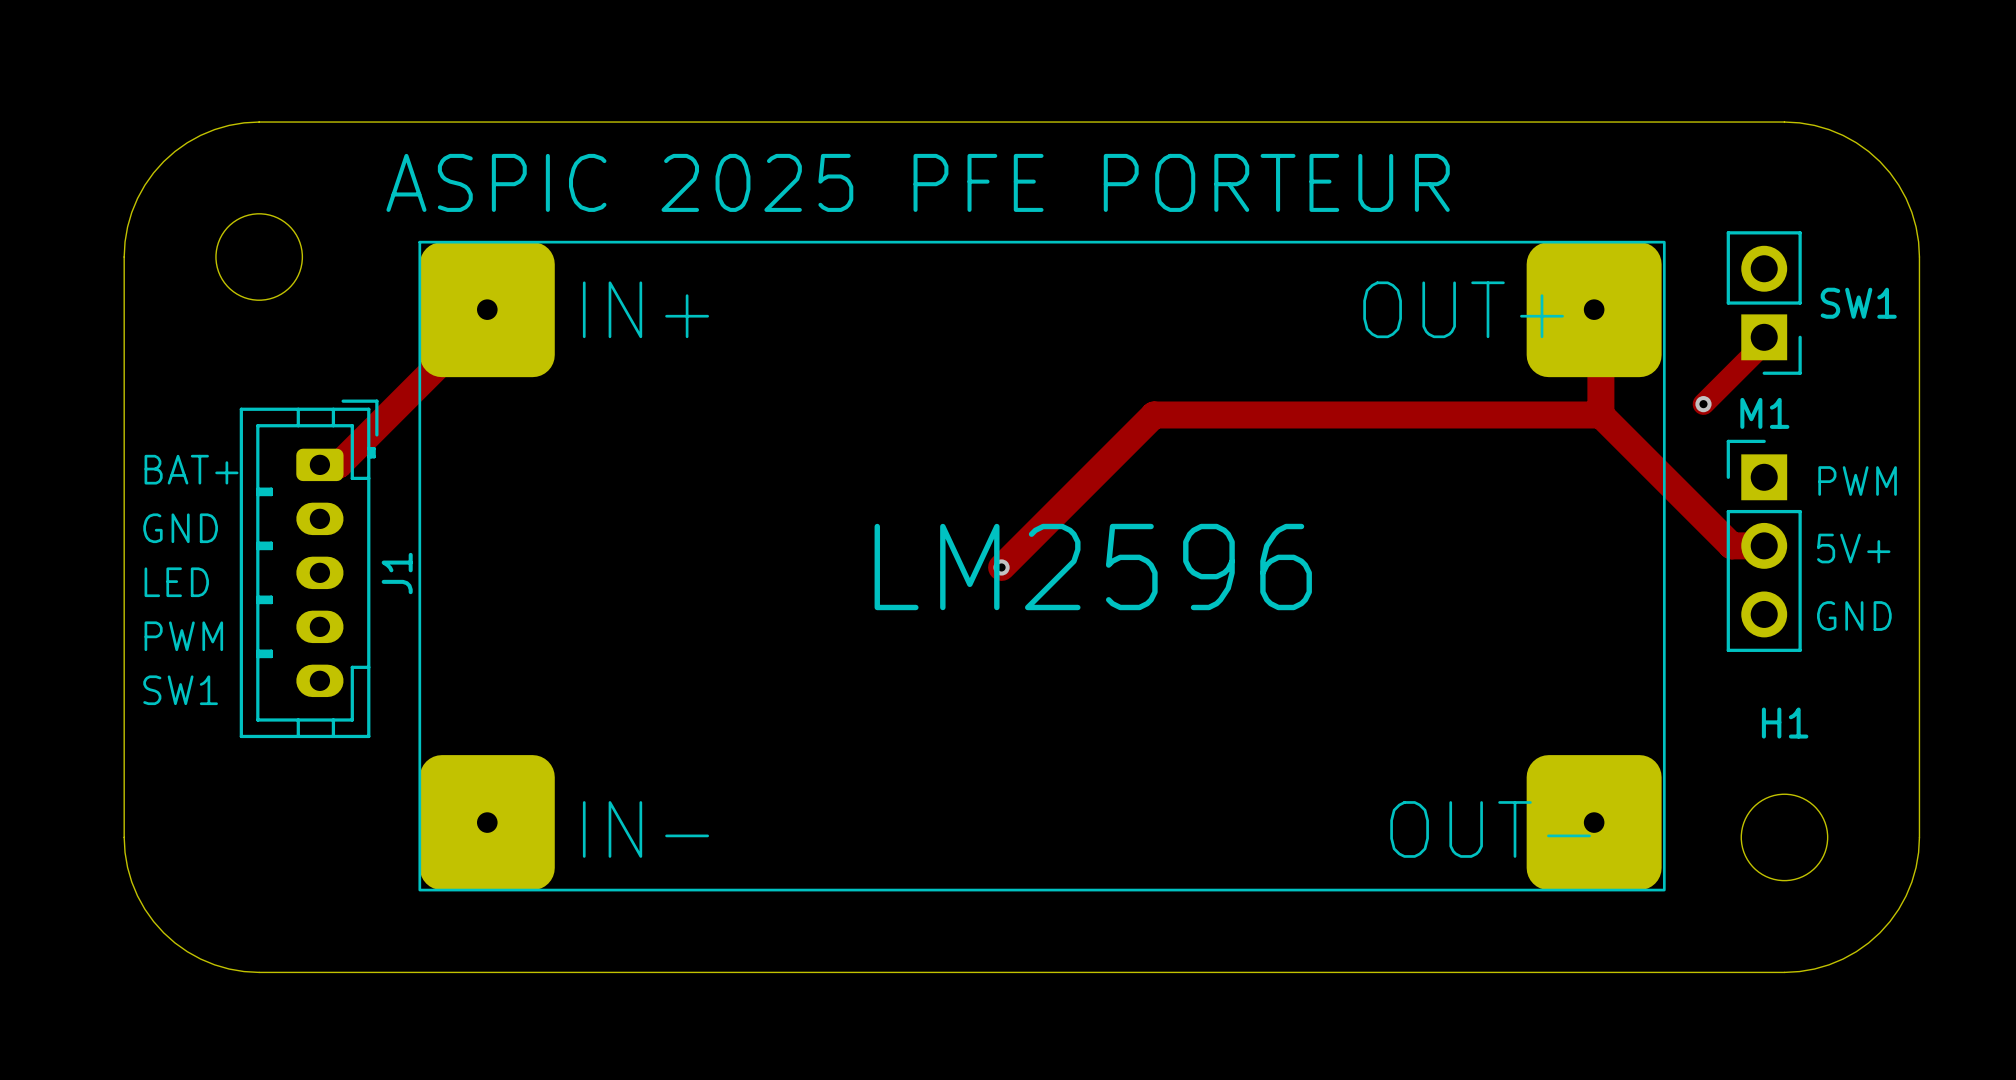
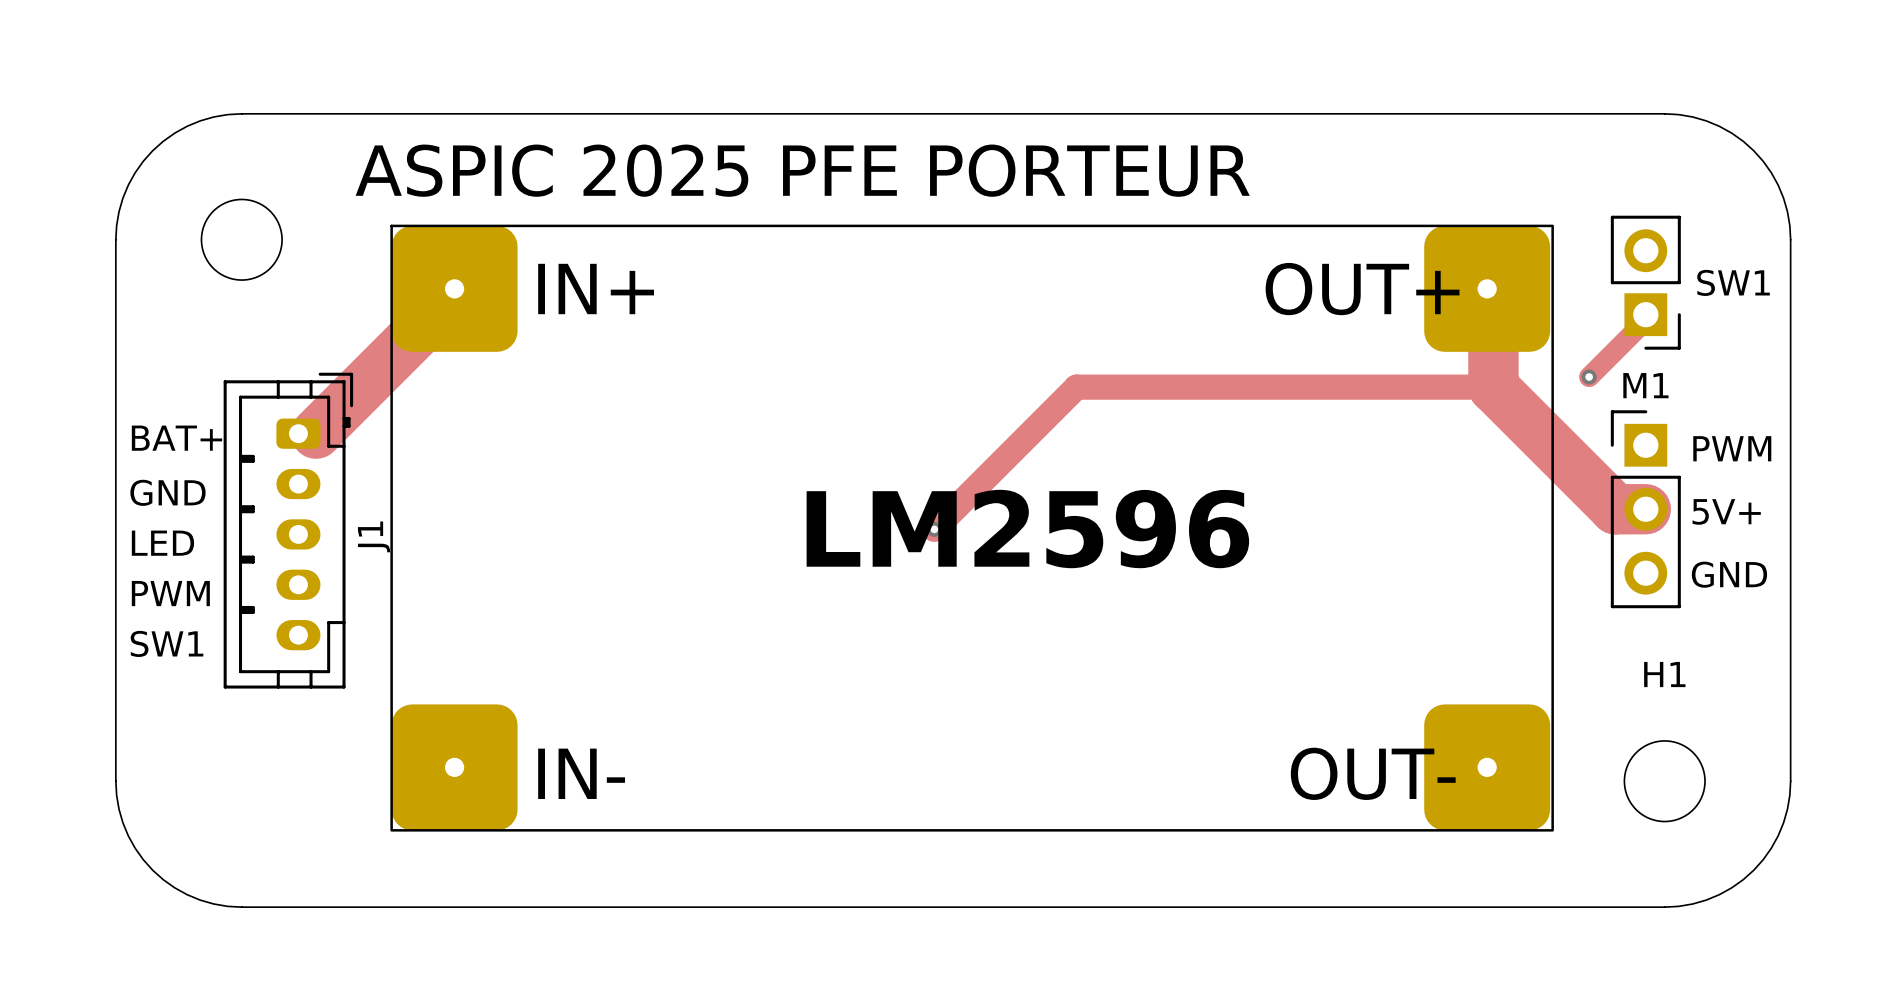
track width: thin (494, 309) (338, 464) -> thick (460, 288) (316, 433)
track width: thin (1600, 309) (1600, 414) (1731, 545) (1764, 545) -> thick (1493, 288) (1493, 387) (1615, 509) (1645, 509)

